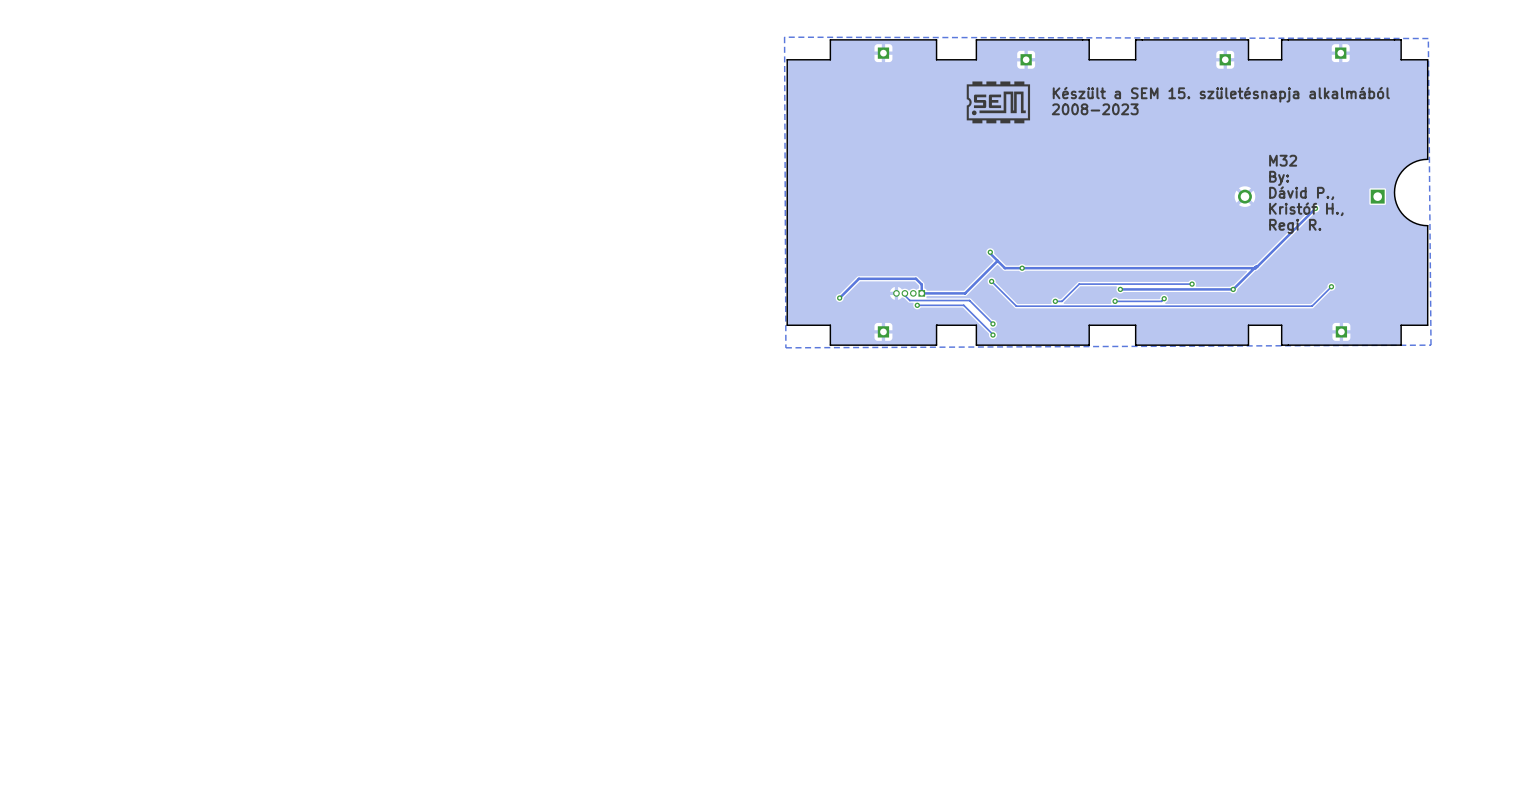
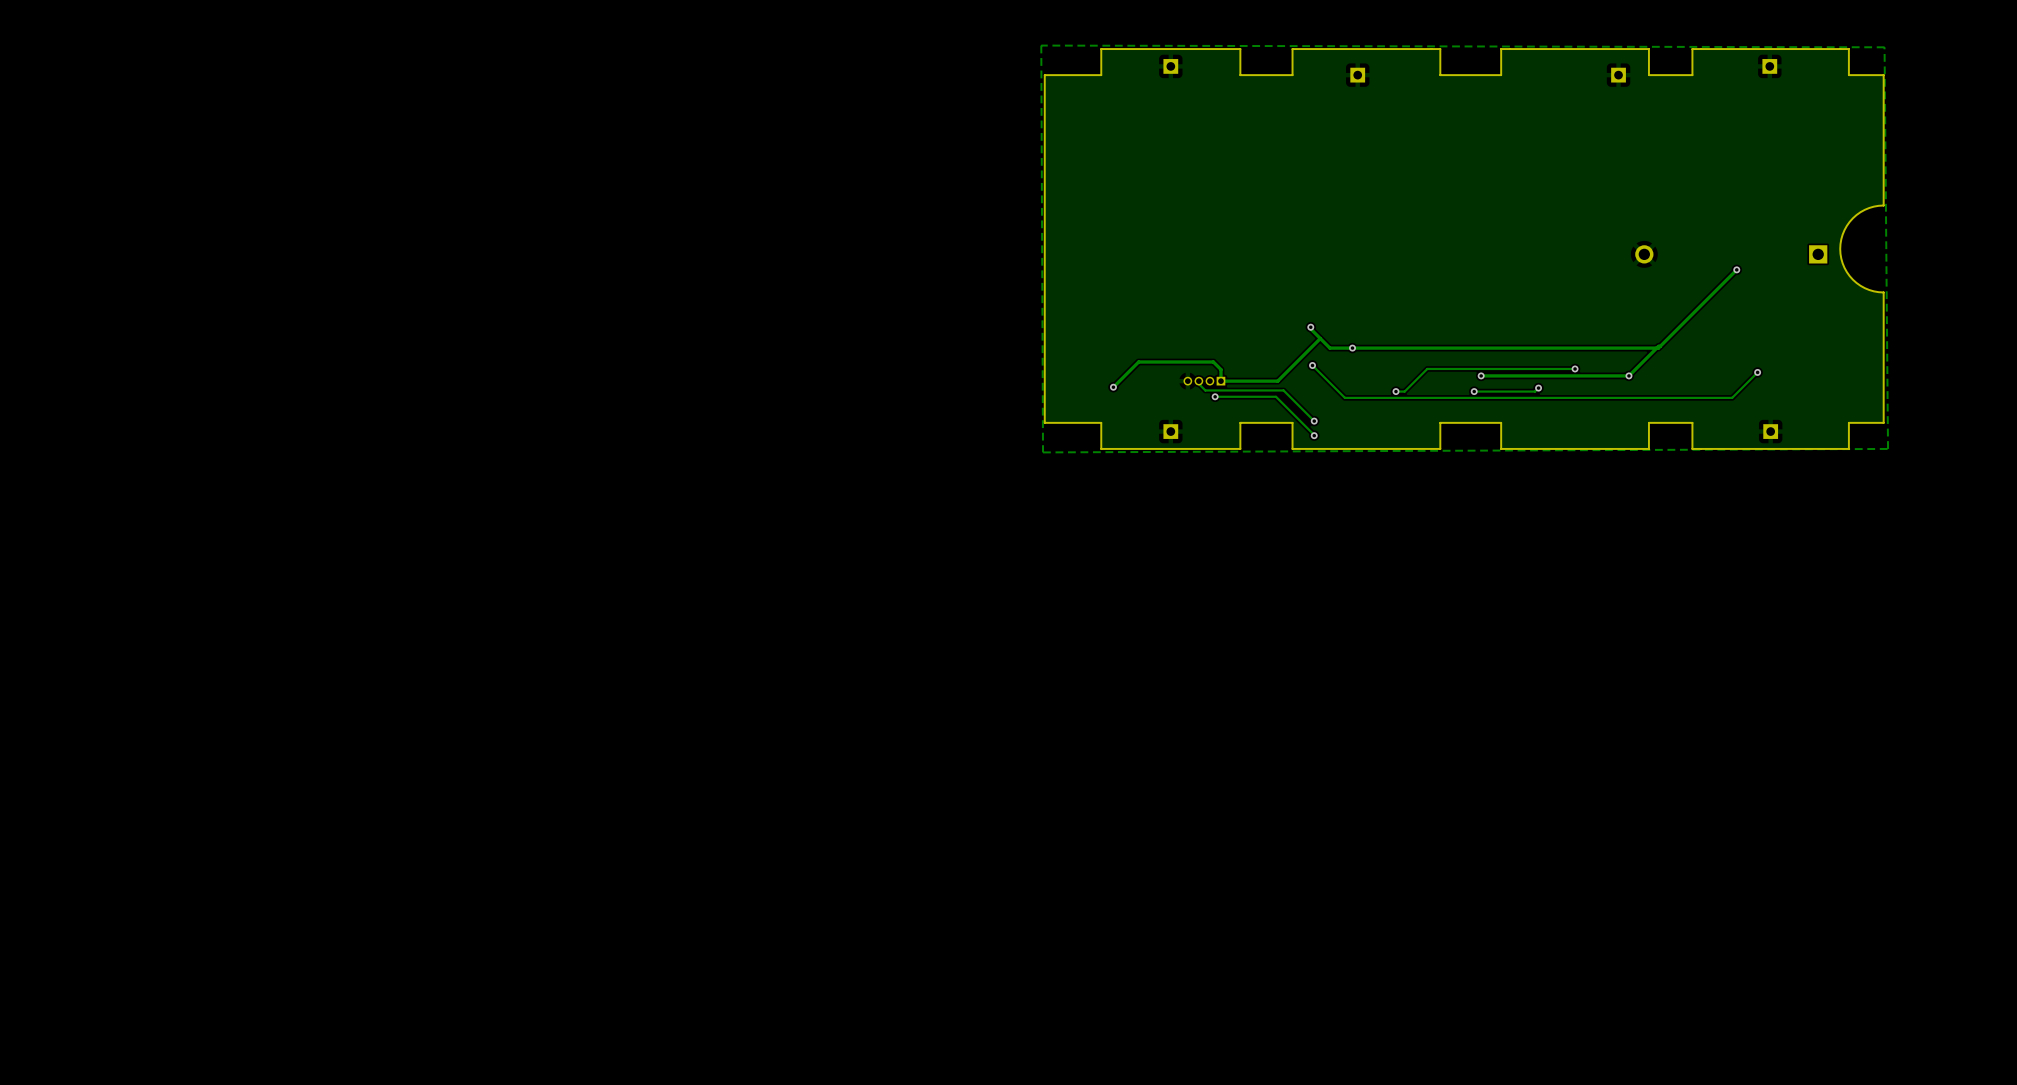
drawing: [966, 81, 1031, 124] -> none
text: Készült a SEM 15. születésnapja alkalmából (1221, 94) -> none
text: 2008-2023 (1095, 109) -> none
text: M32 (1283, 160) -> none
text: By: (1279, 178) -> none
text: Dávid P., (1301, 193) -> none
text: Kristóf H., (1306, 209) -> none
text: Regi R. (1295, 226) -> none

